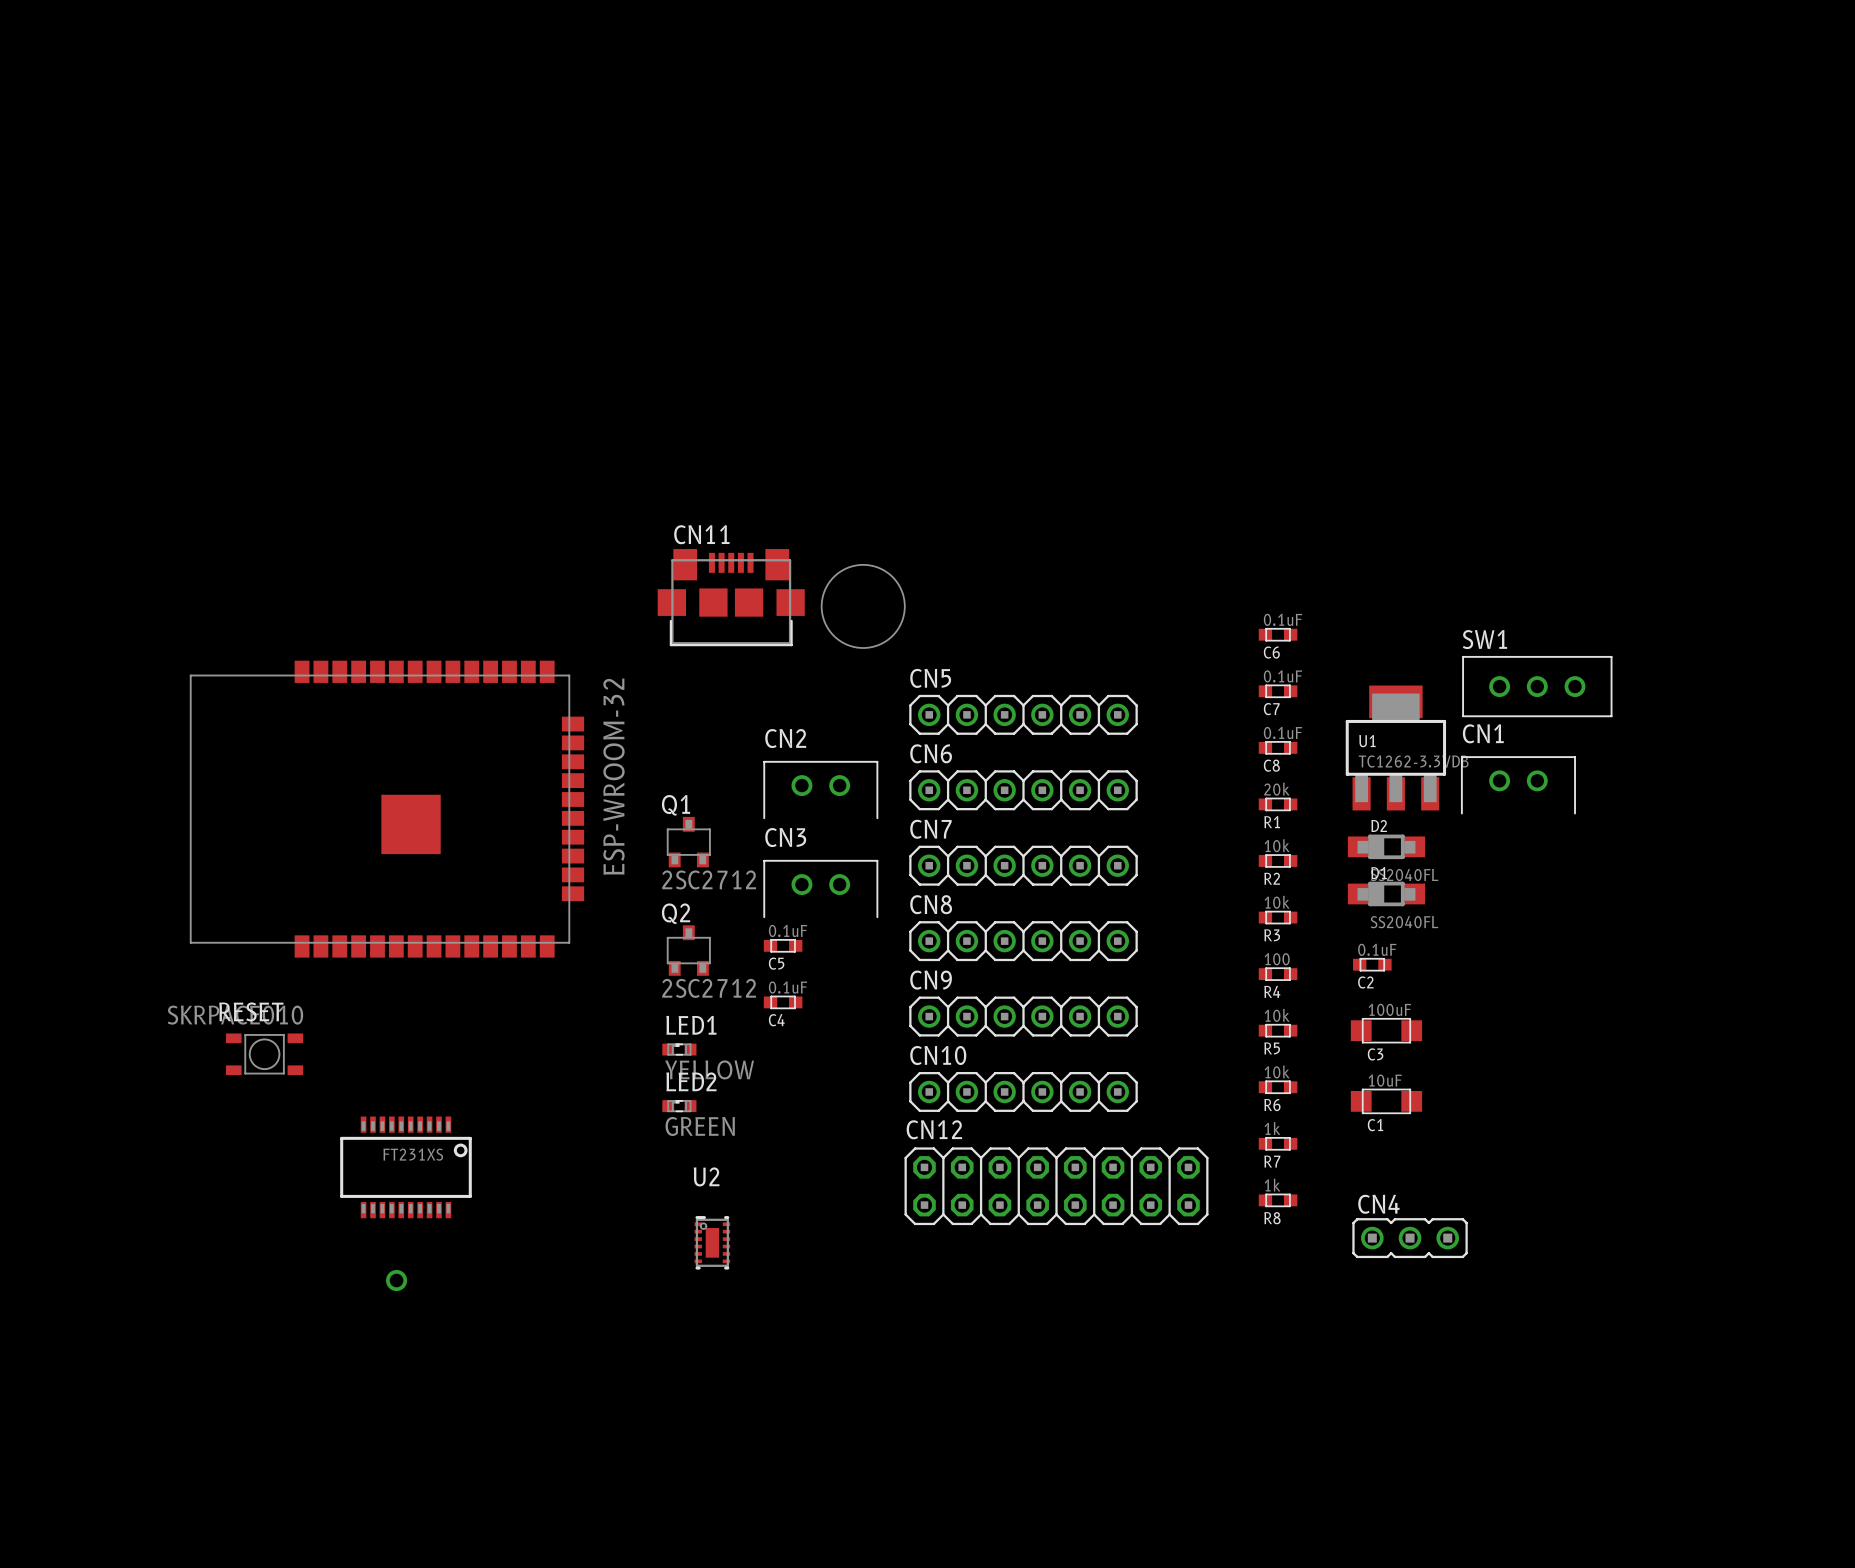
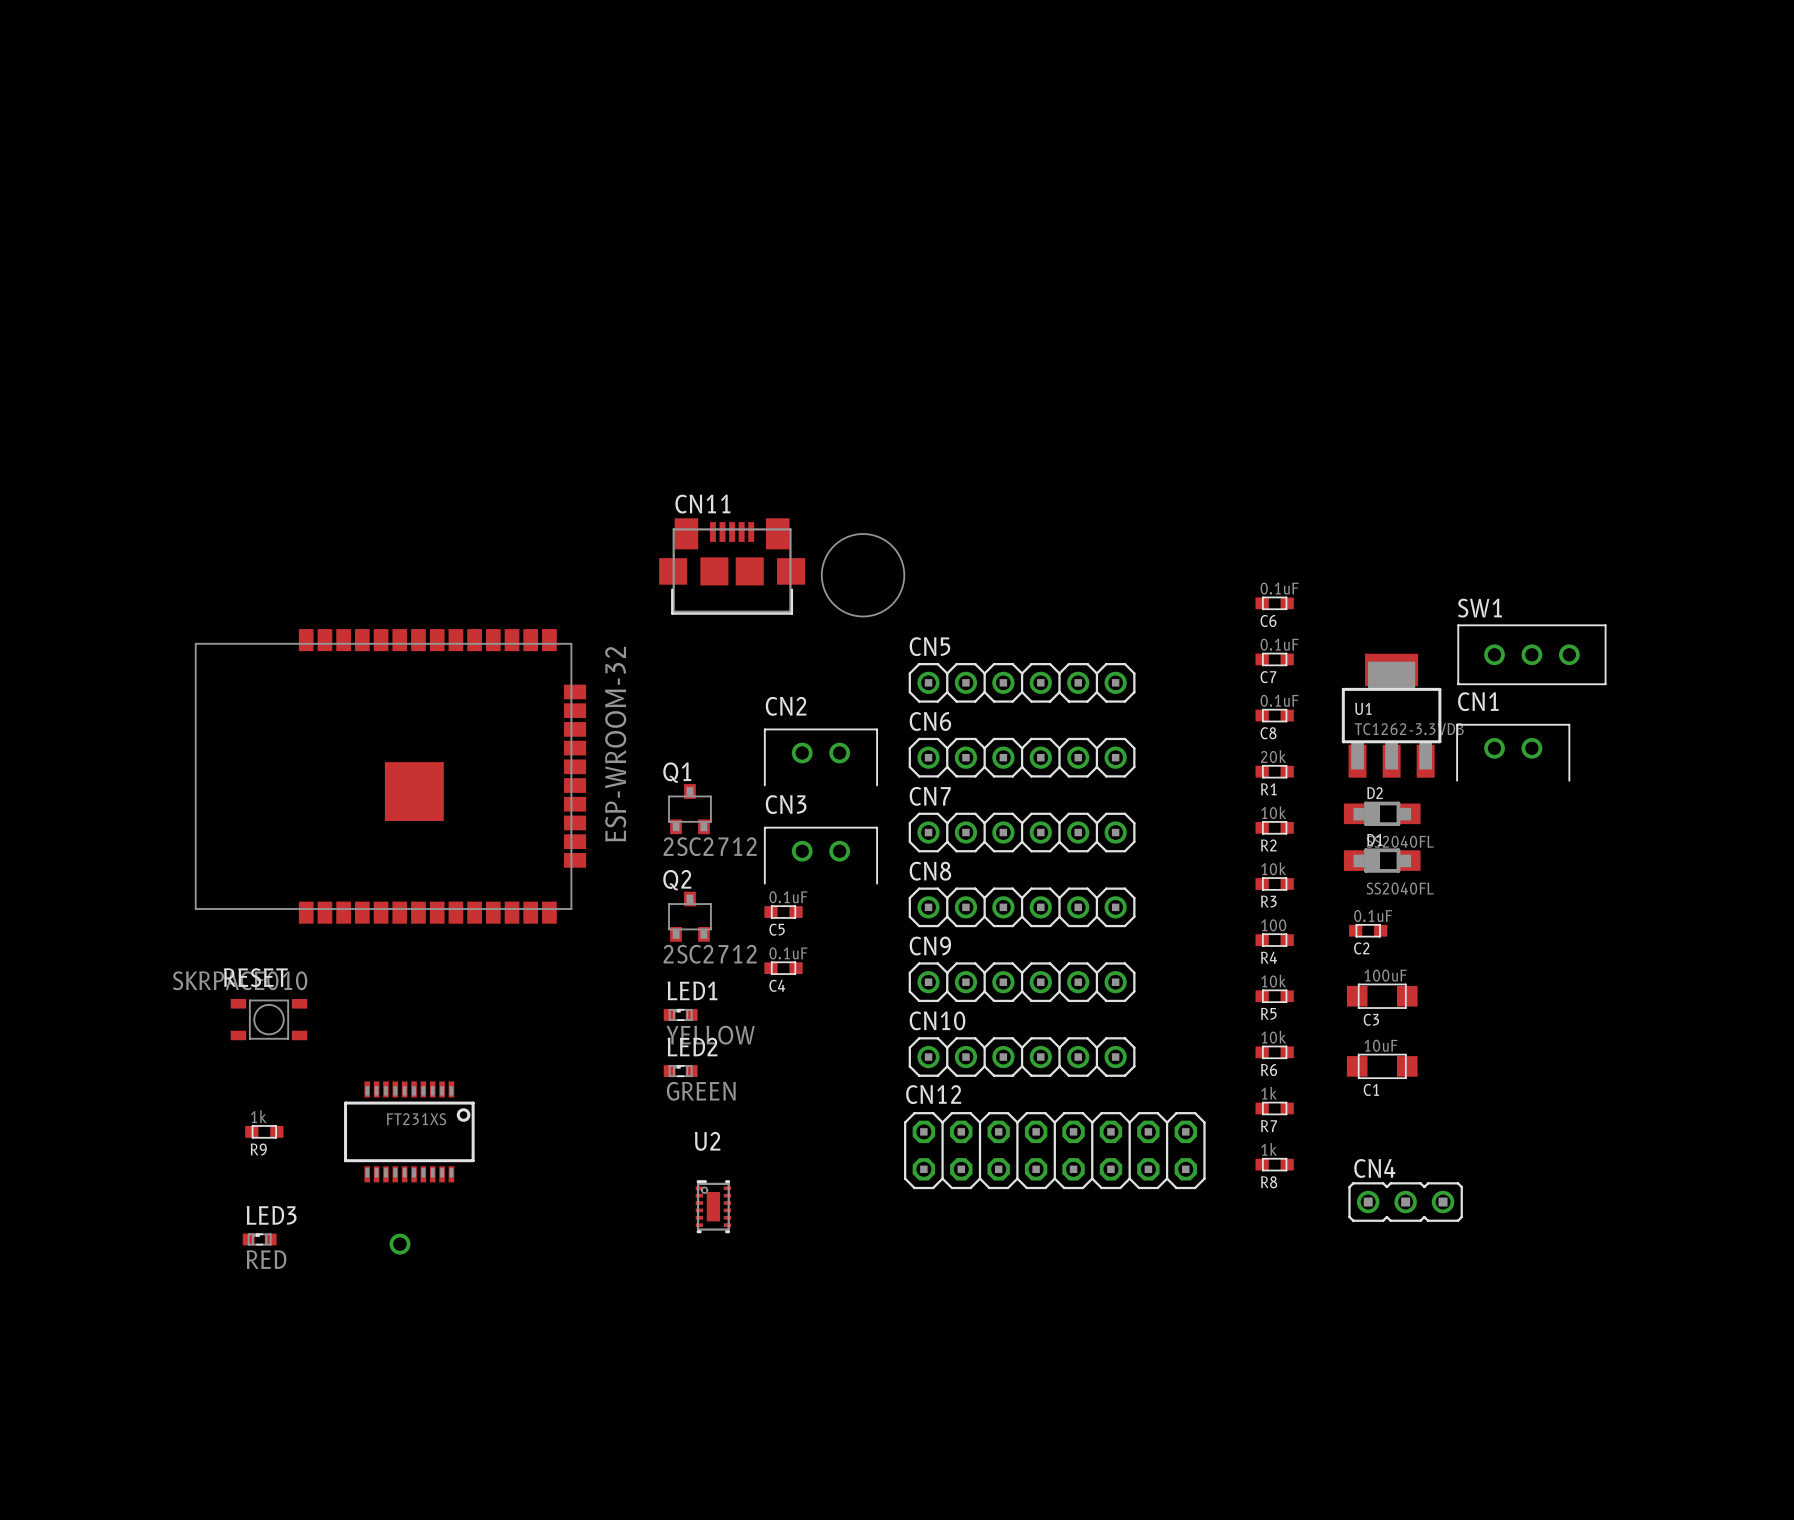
R9: none -> 1k (264, 1131)
LED3: none -> RED (259, 1239)

